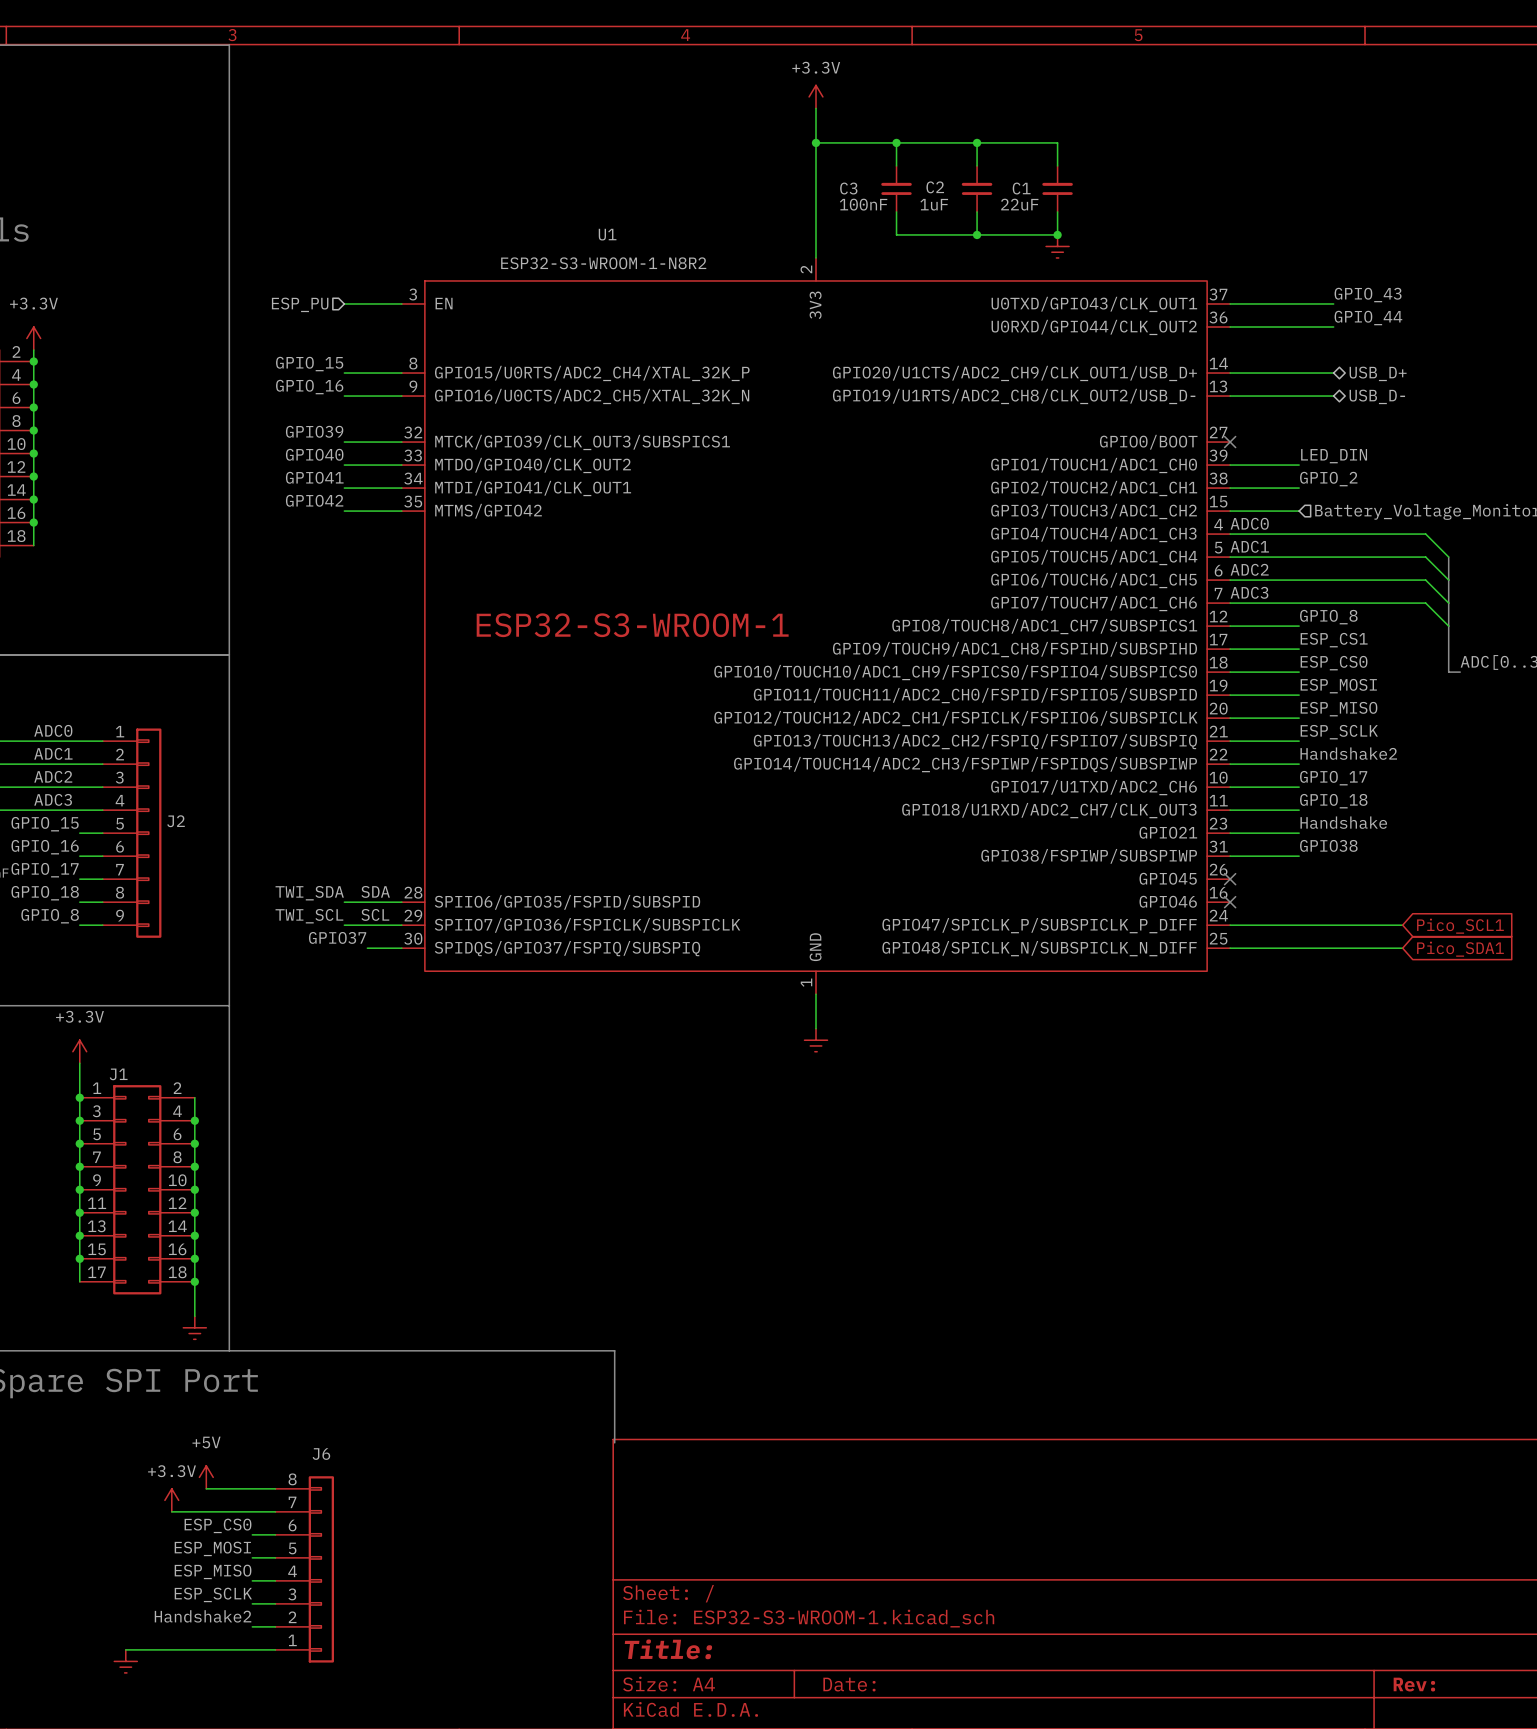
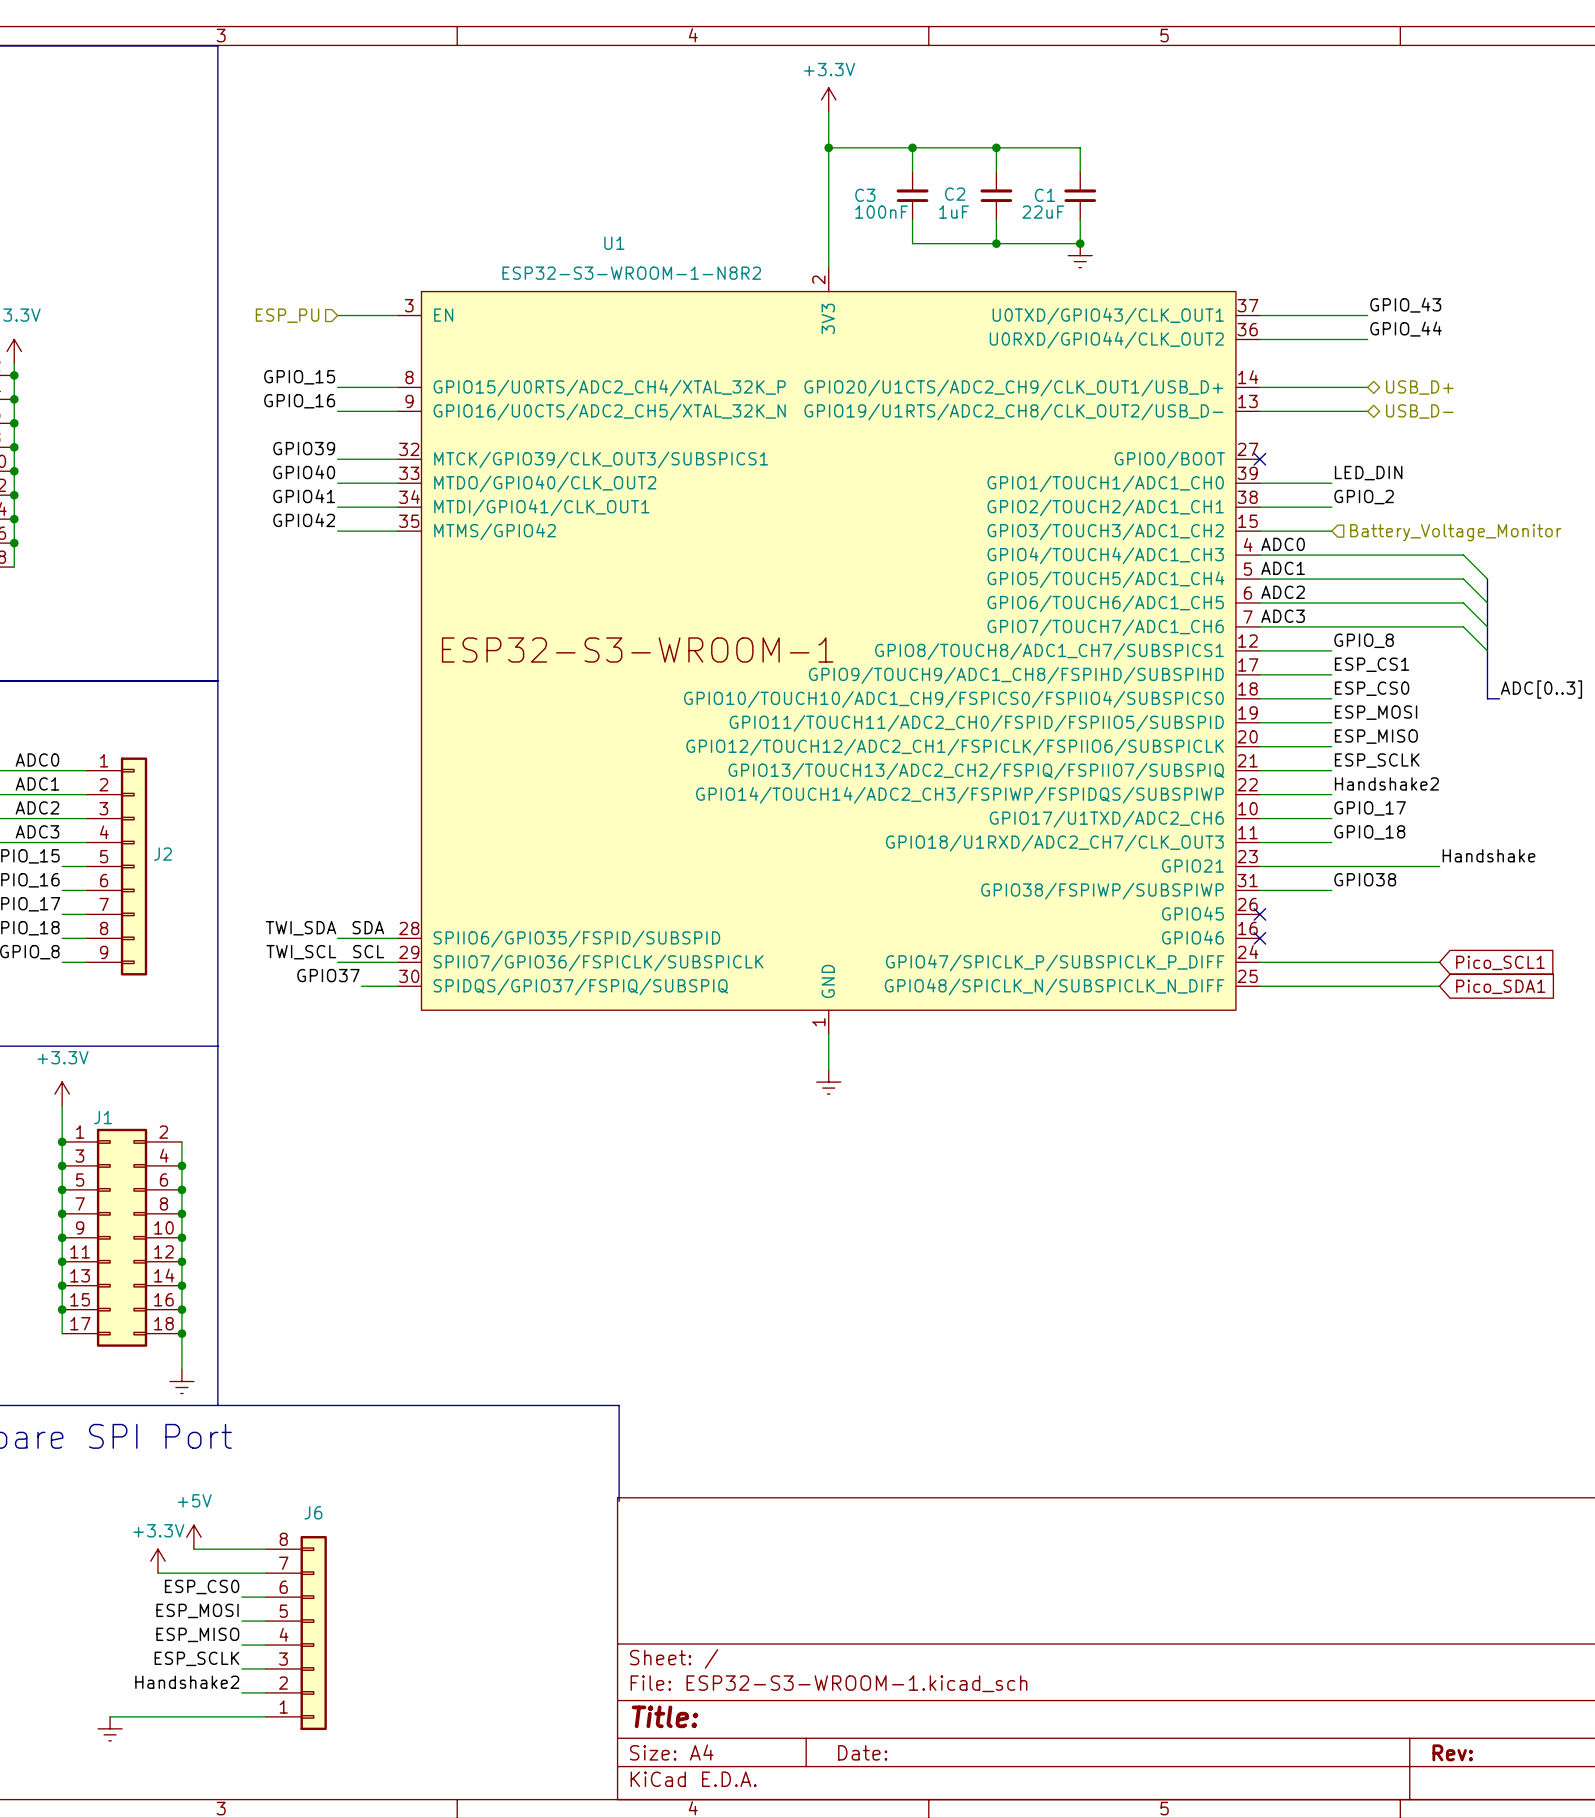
label position: Handshake (1343, 822) -> Handshake (1488, 855)
wire: none -> (1331, 866) (1439, 866)

